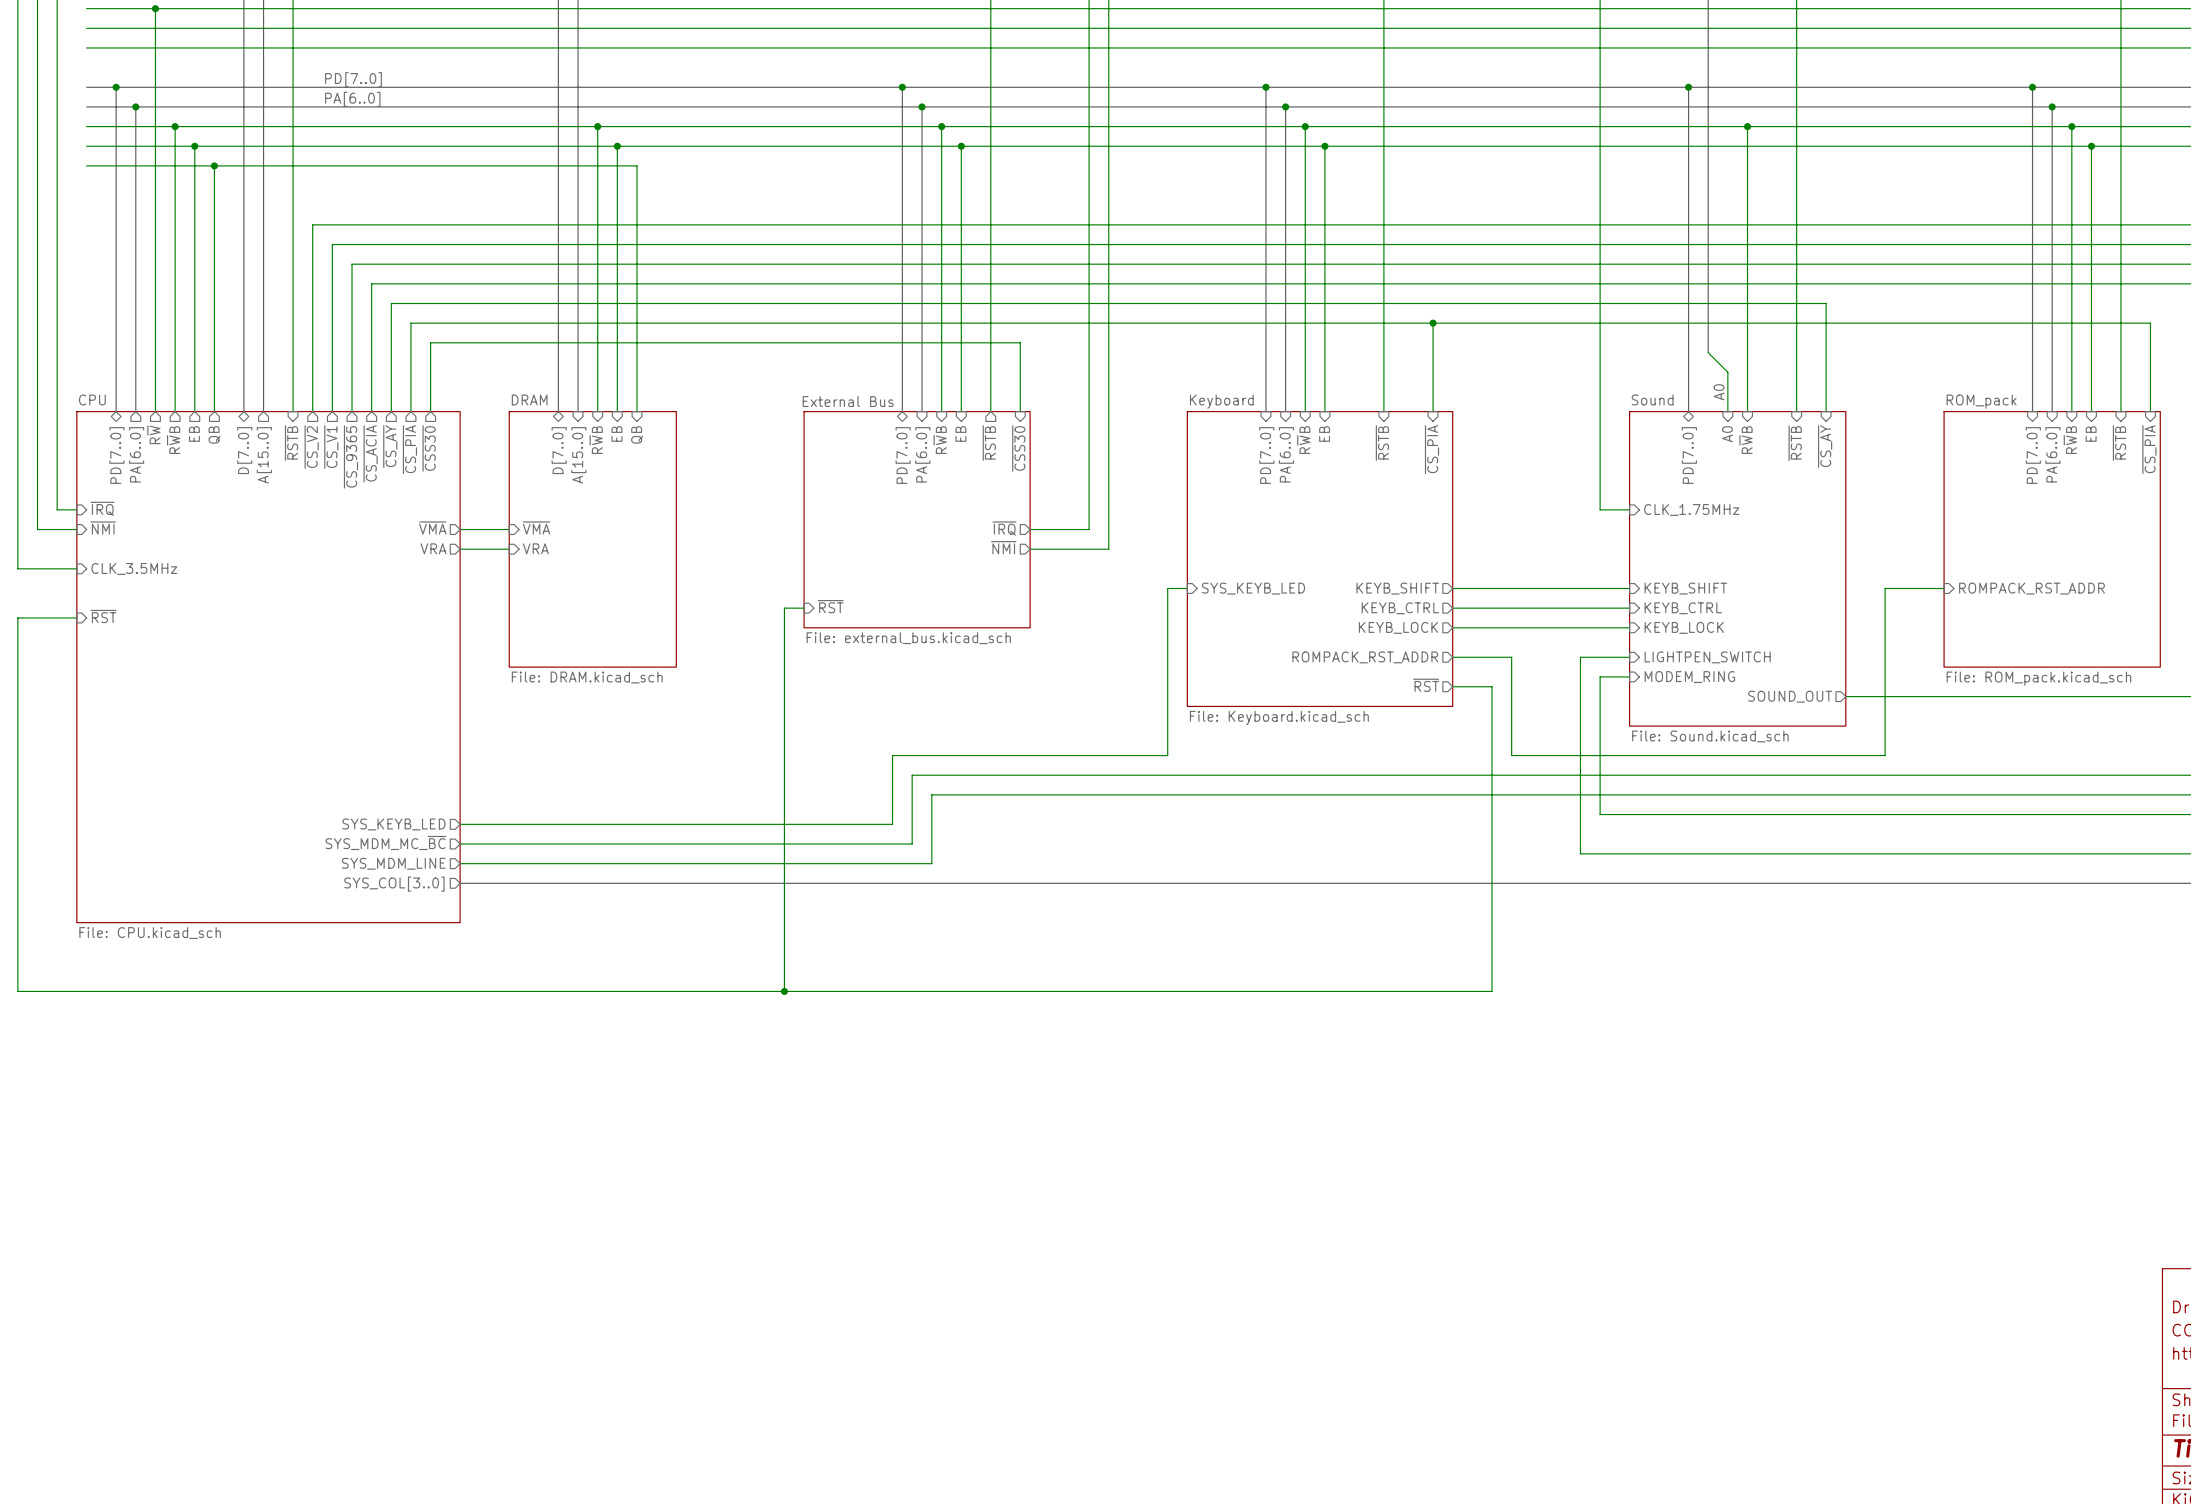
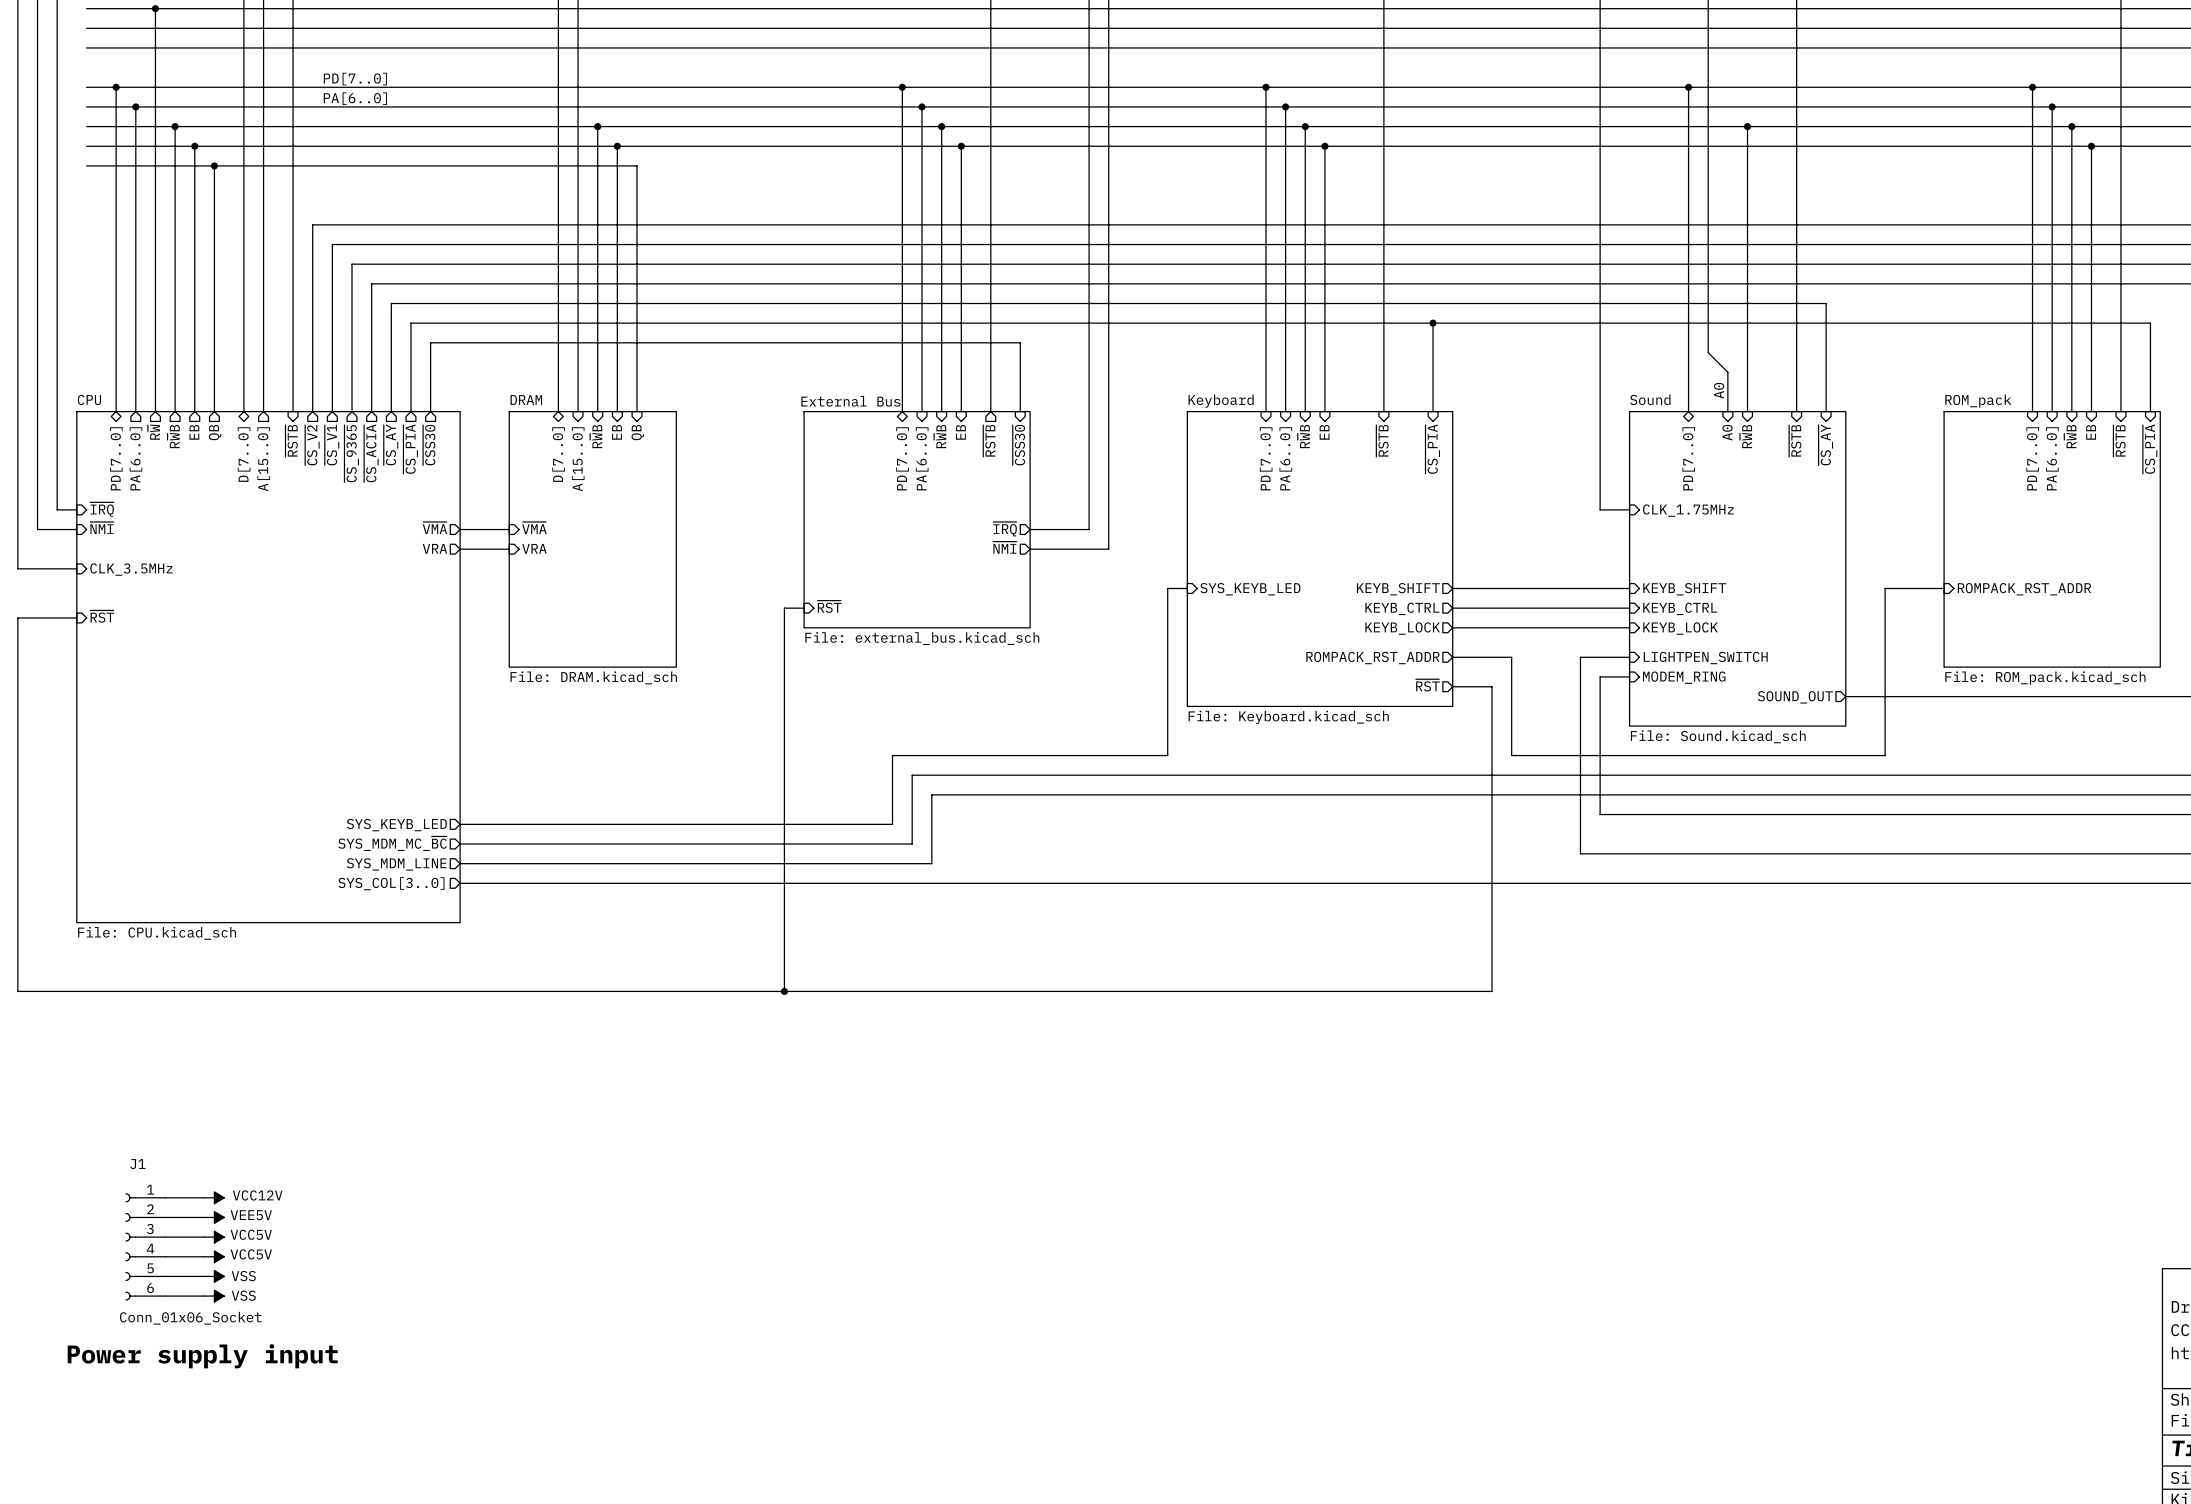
wire: none -> (165, 1197) (204, 1197)
power symbol: none -> VCC12V (214, 1197)
wire: none -> (165, 1217) (204, 1217)
power symbol: none -> VEE5V (214, 1217)
wire: none -> (165, 1237) (204, 1237)
power symbol: none -> VCC5V (214, 1237)
J1: none -> Conn_01x06_Socket (145, 1246)
wire: none -> (165, 1256) (204, 1256)
power symbol: none -> VCC5V (214, 1256)
wire: none -> (165, 1276) (204, 1276)
power symbol: none -> VSS (214, 1276)
wire: none -> (165, 1296) (204, 1296)
power symbol: none -> VSS (214, 1296)
text: none -> Power supply input (202, 1356)

